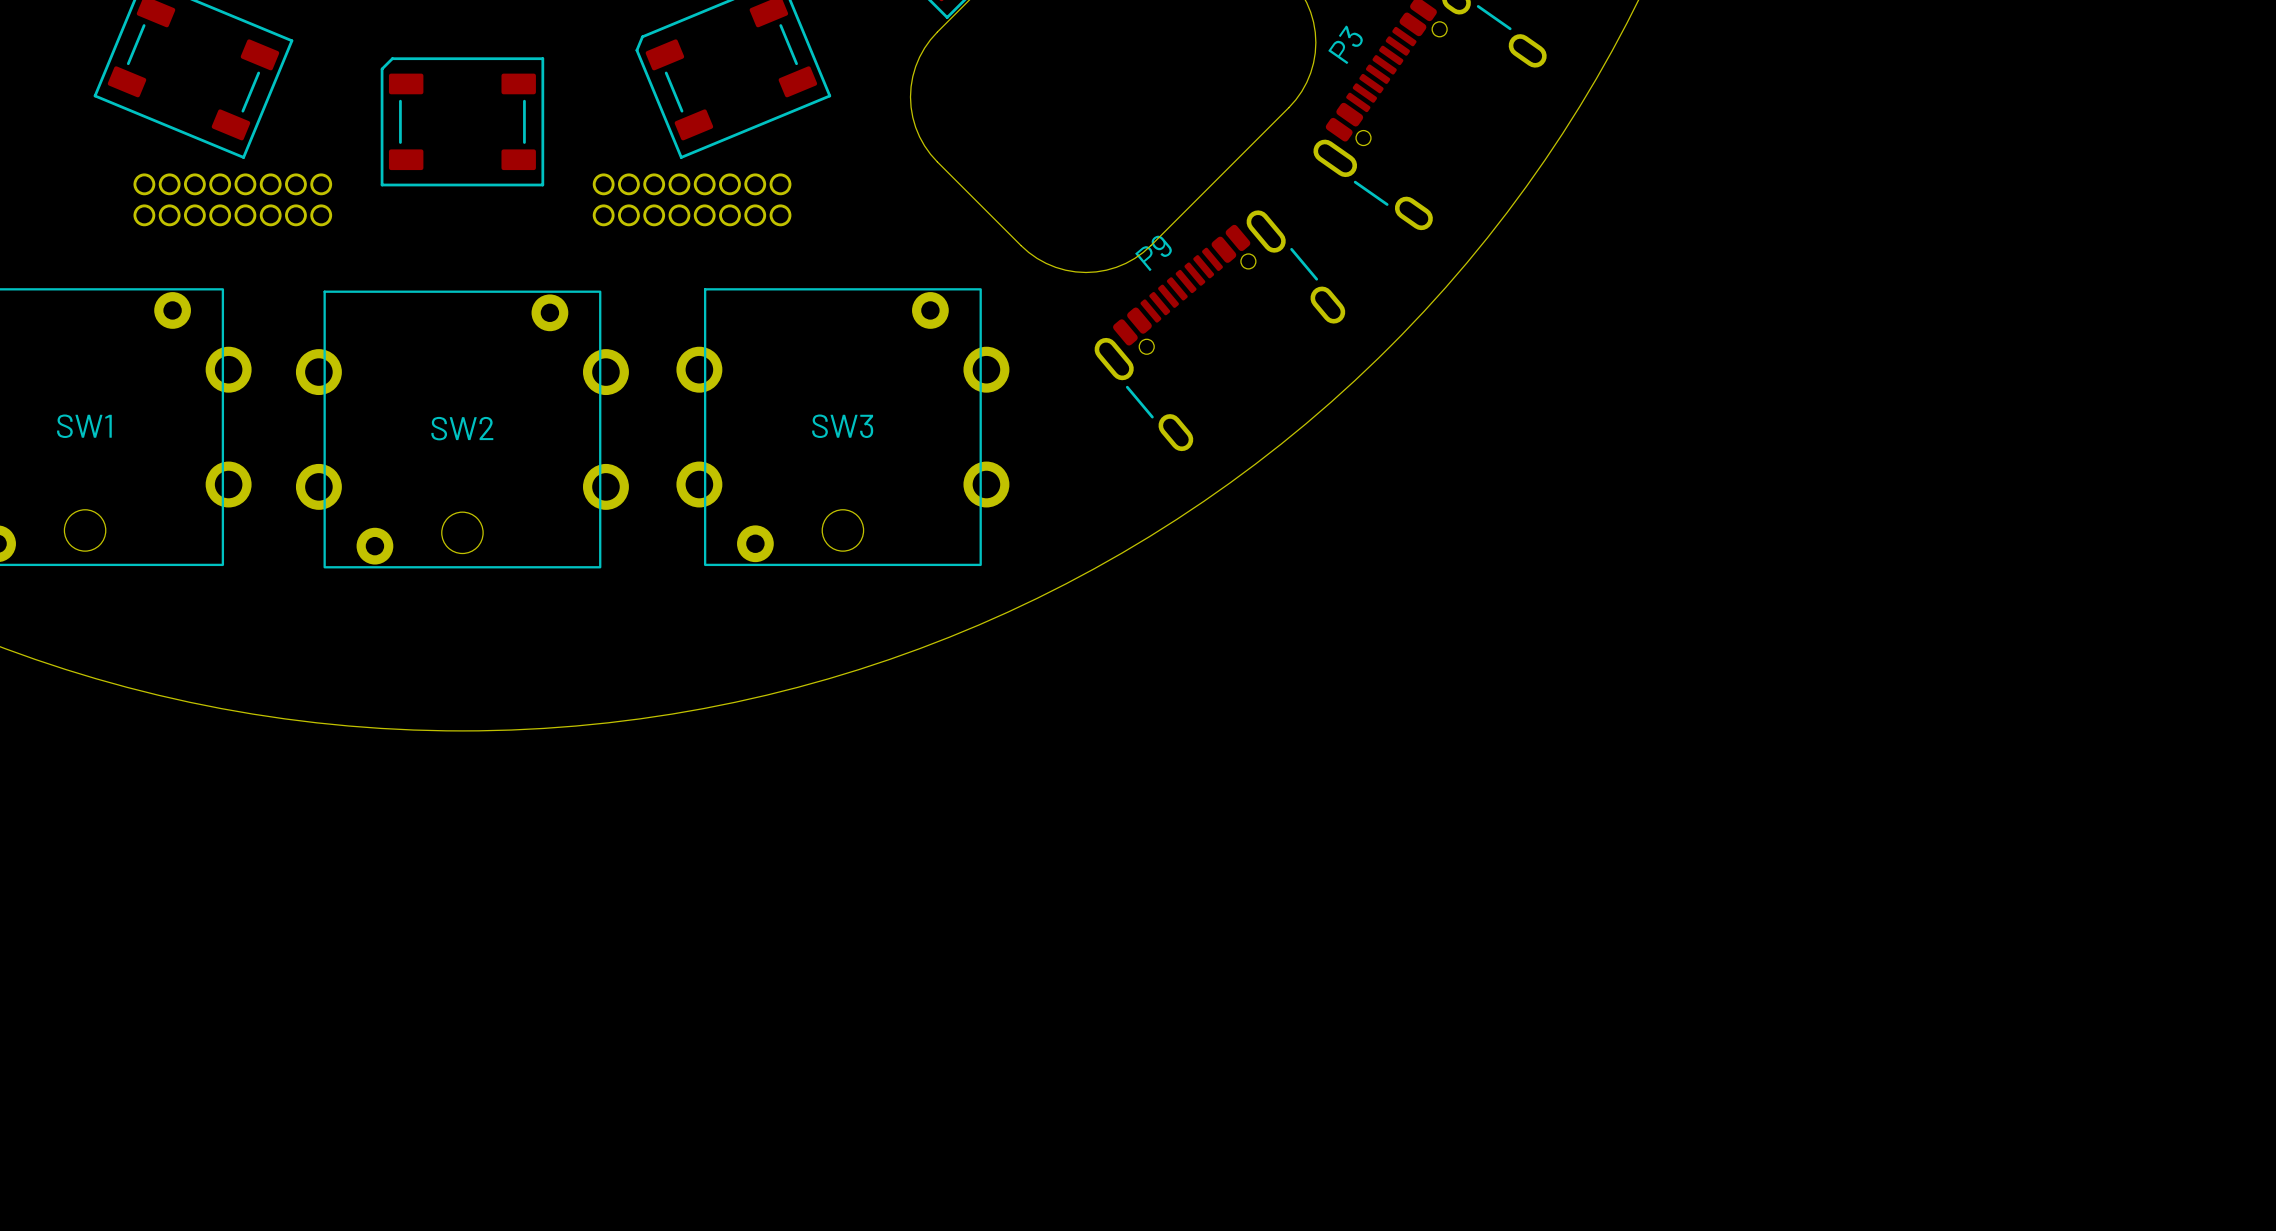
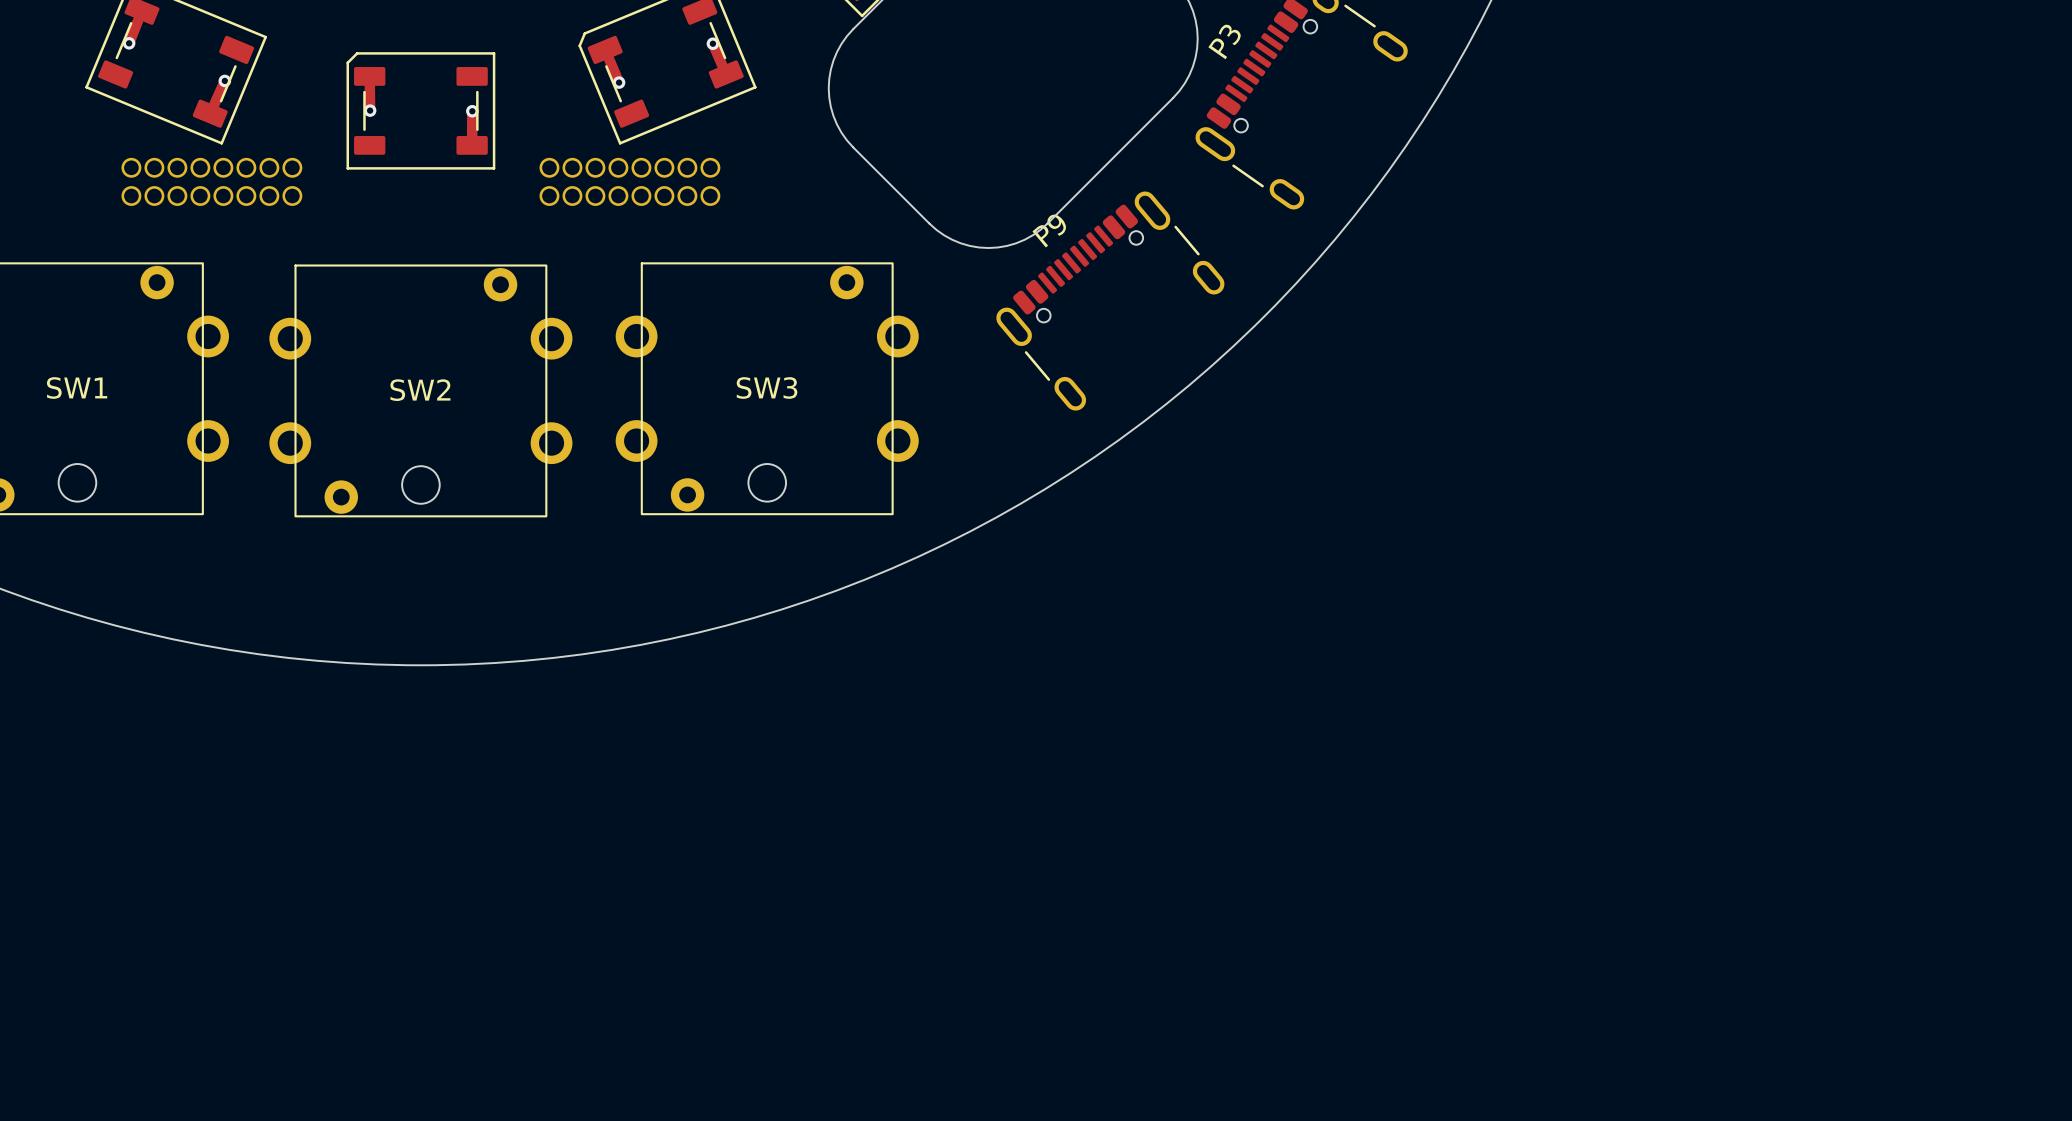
track: none -> (142, 10) (129, 43)
via: none -> (129, 43)
track: none -> (712, 43) (726, 74)
via: none -> (712, 43)
track: none -> (605, 49) (619, 82)
track: none -> (369, 76) (370, 110)
track: none -> (224, 80) (210, 113)
via: none -> (224, 80)
via: none -> (619, 82)
via: none -> (370, 110)
track: none -> (472, 111) (472, 145)
via: none -> (472, 111)

